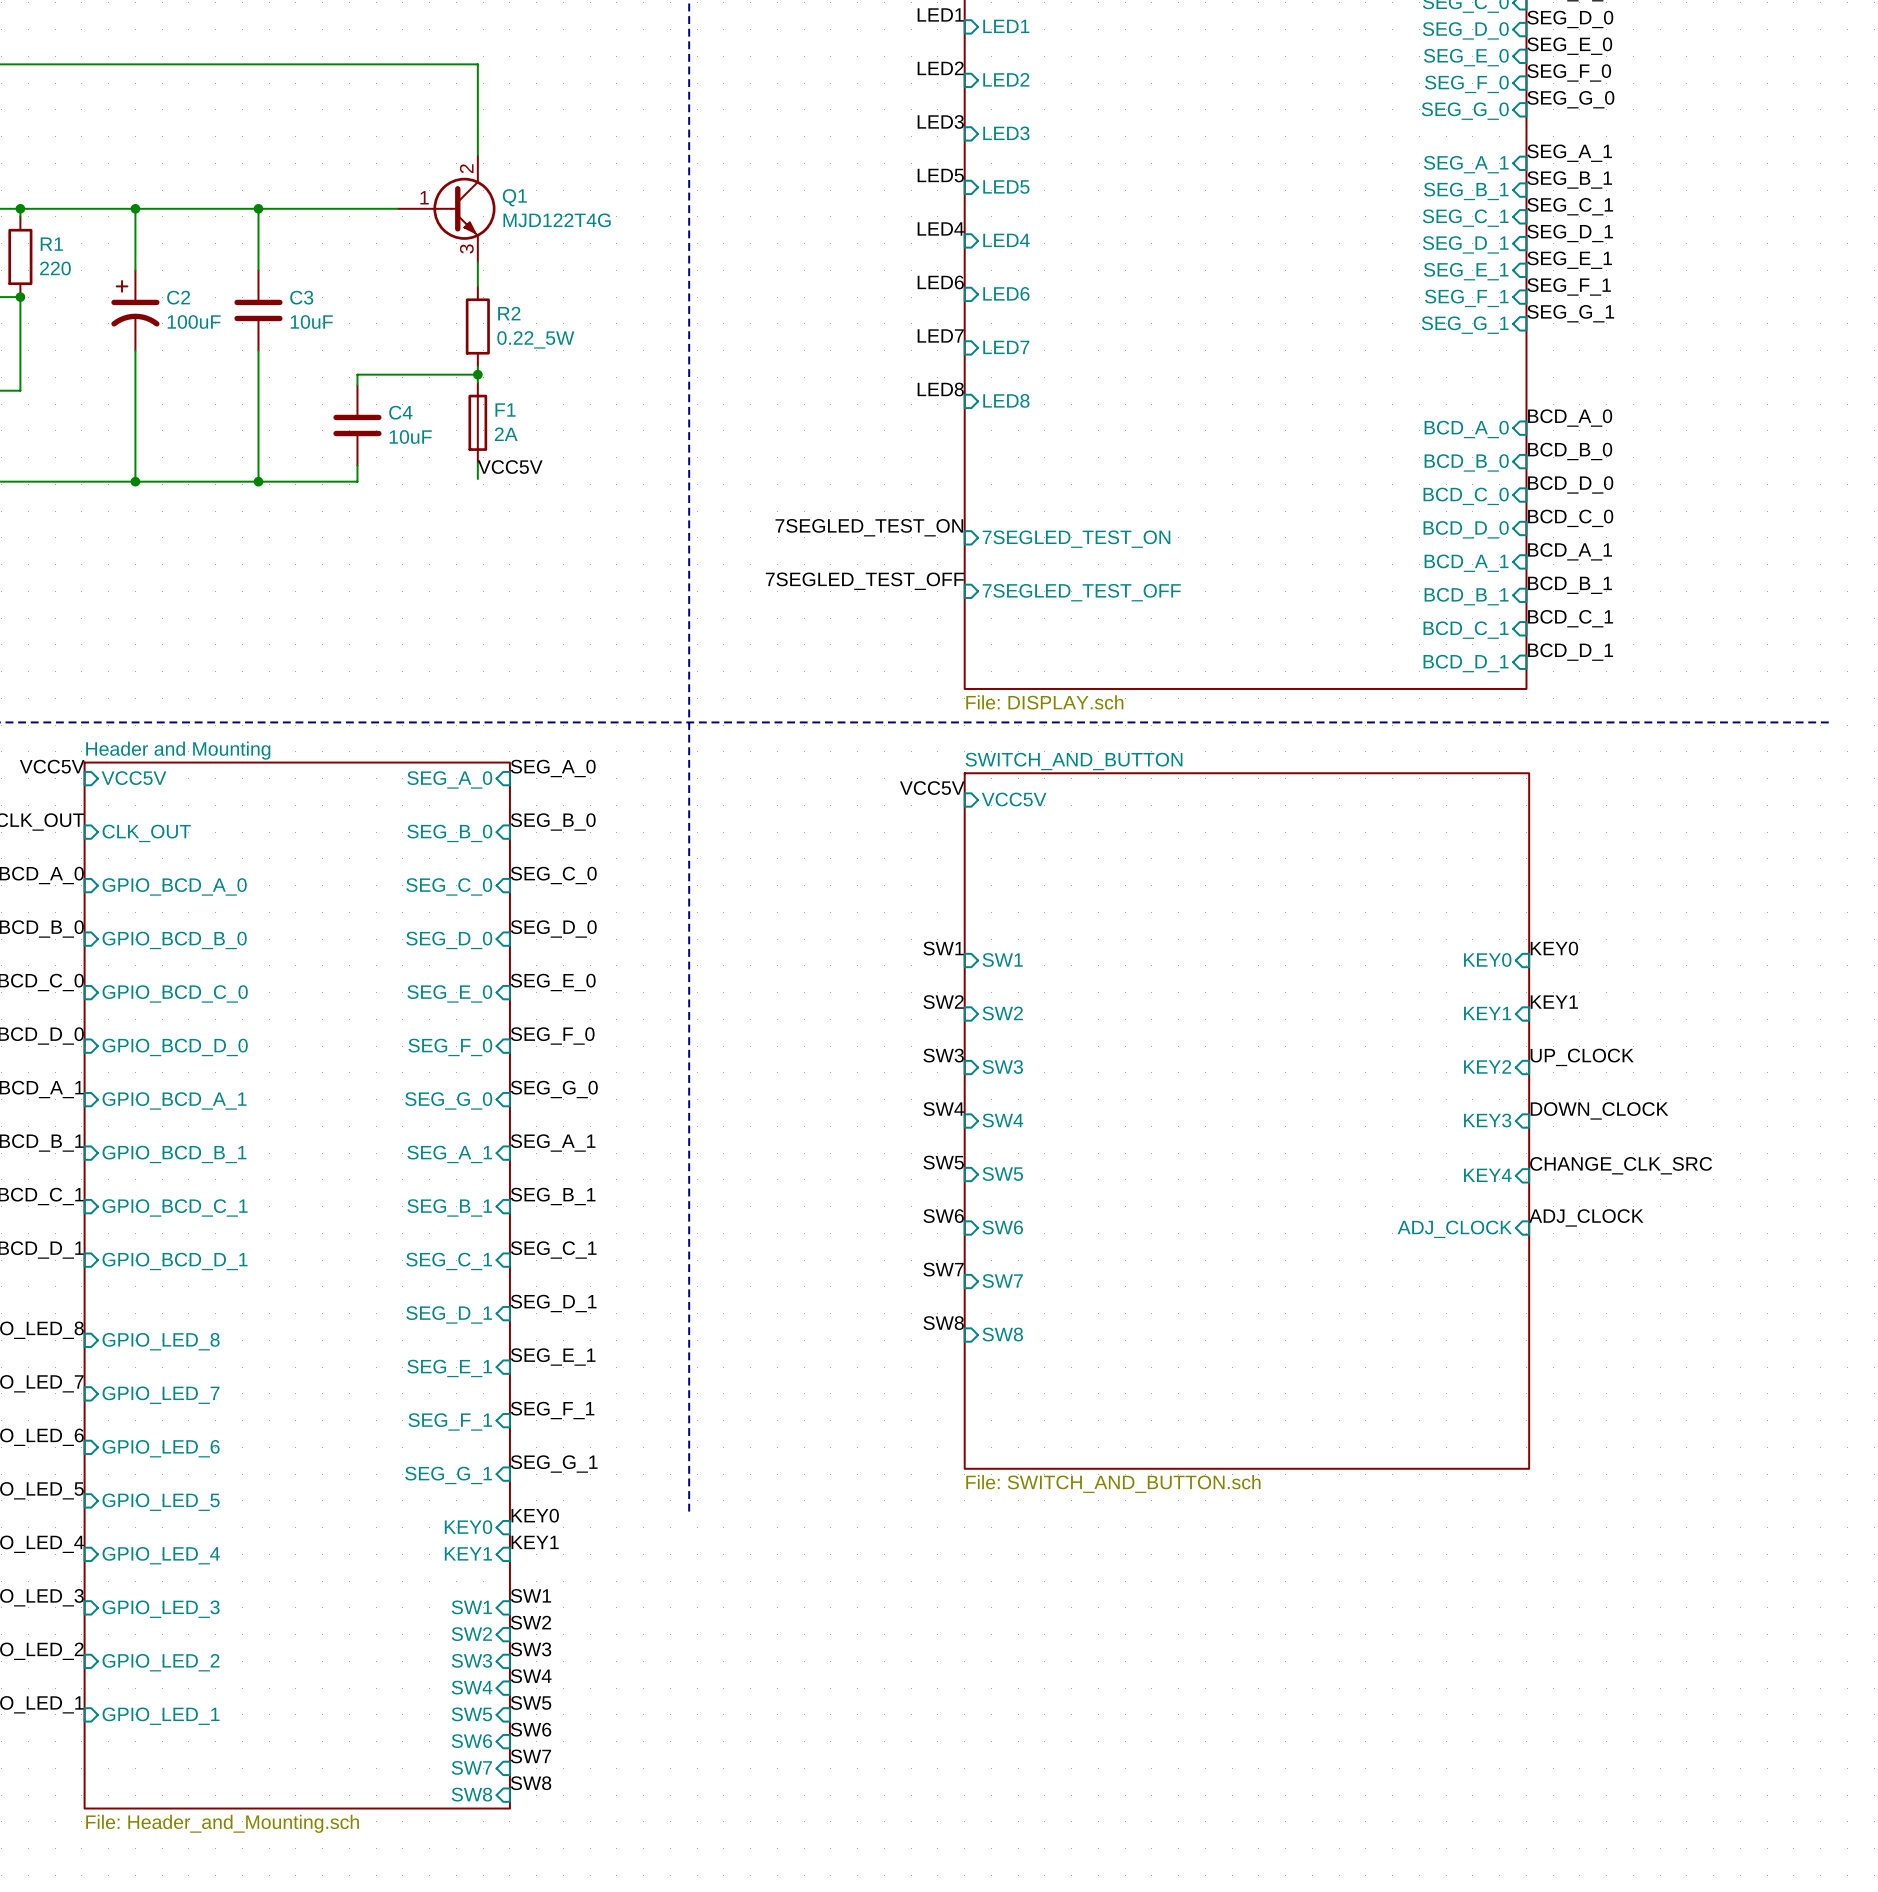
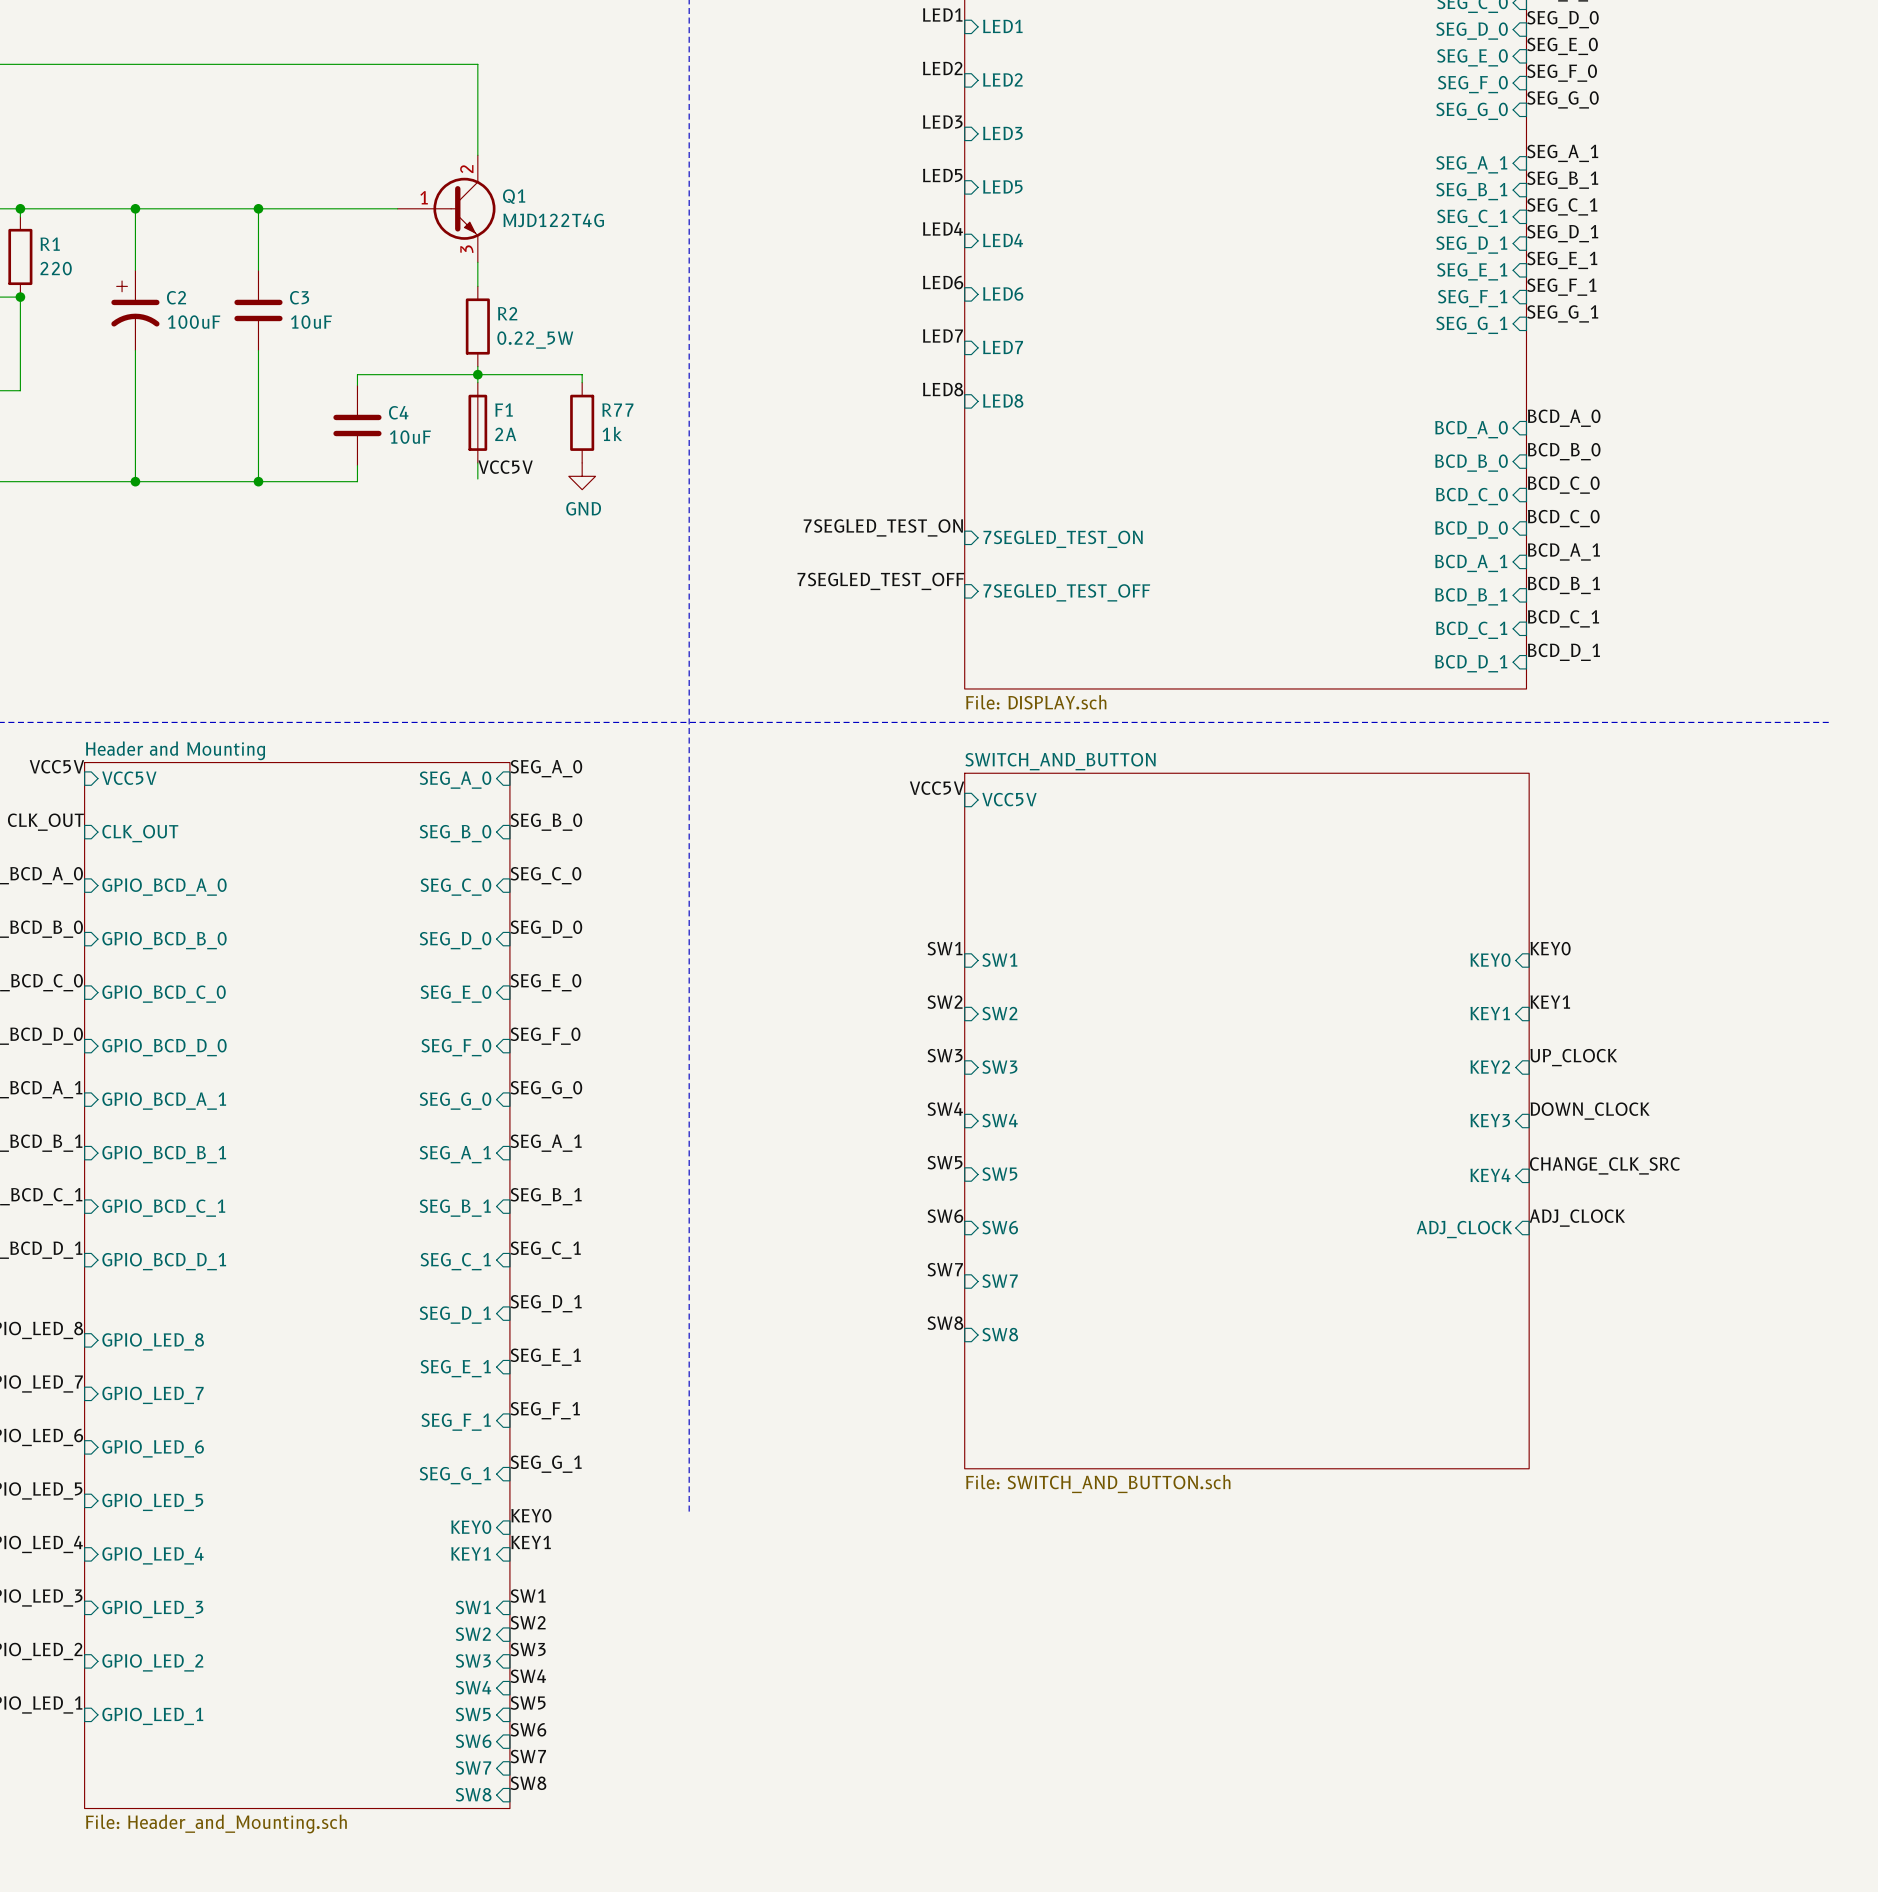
wire: none -> (477, 374) (582, 374) (582, 382)
R77: none -> 1k (582, 422)
power symbol: none -> GND (582, 476)
label: BCD_D_0 (1570, 484) -> BCD_C_0 (1563, 485)

